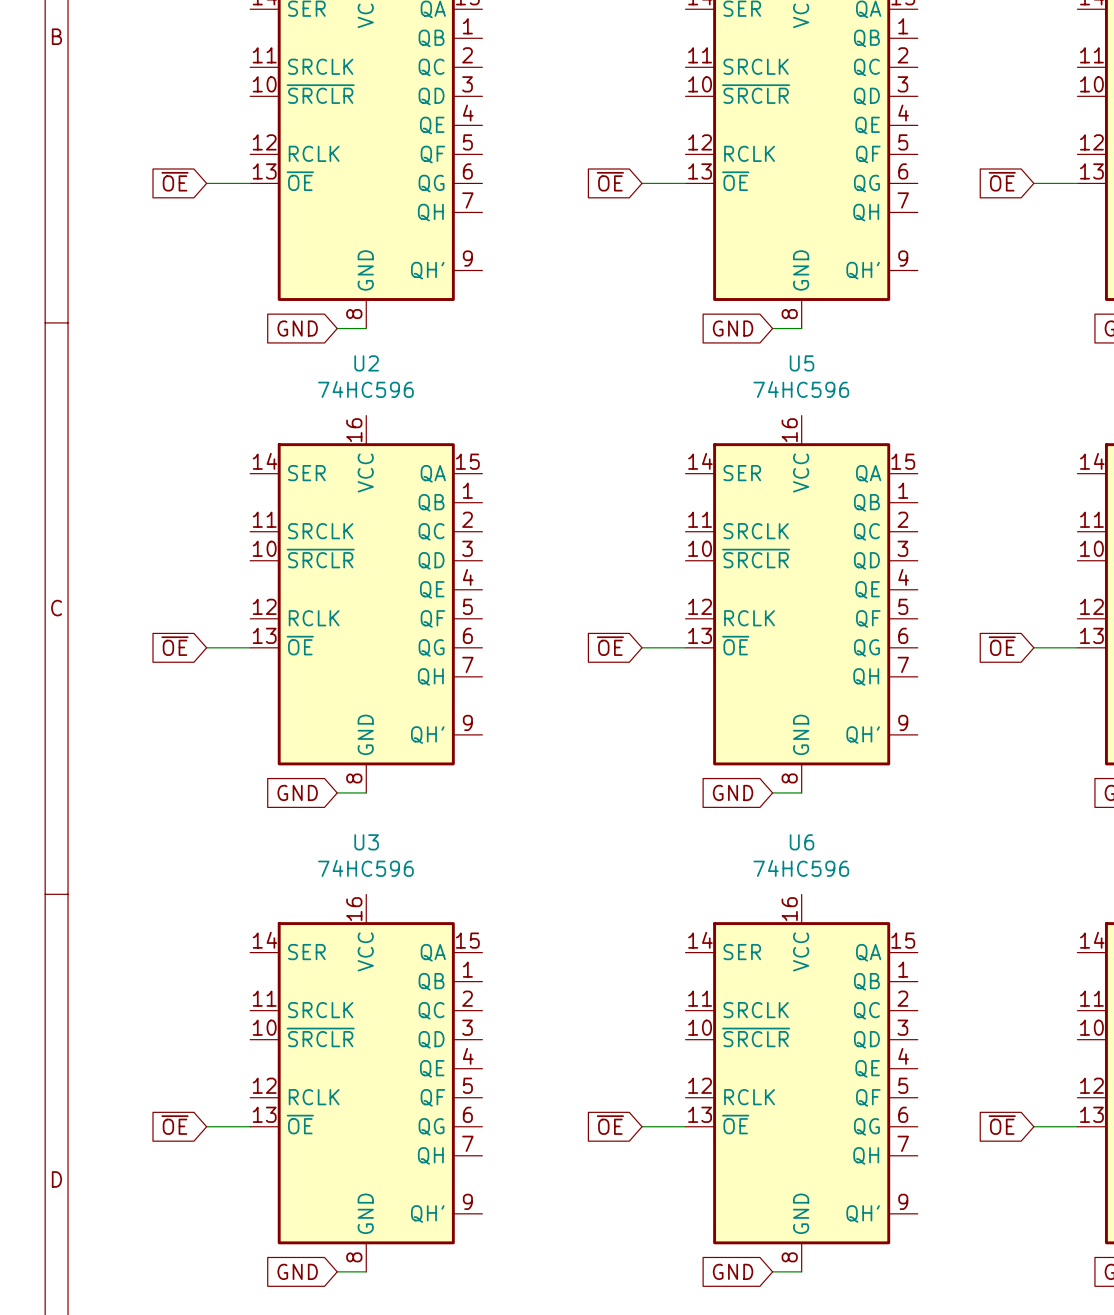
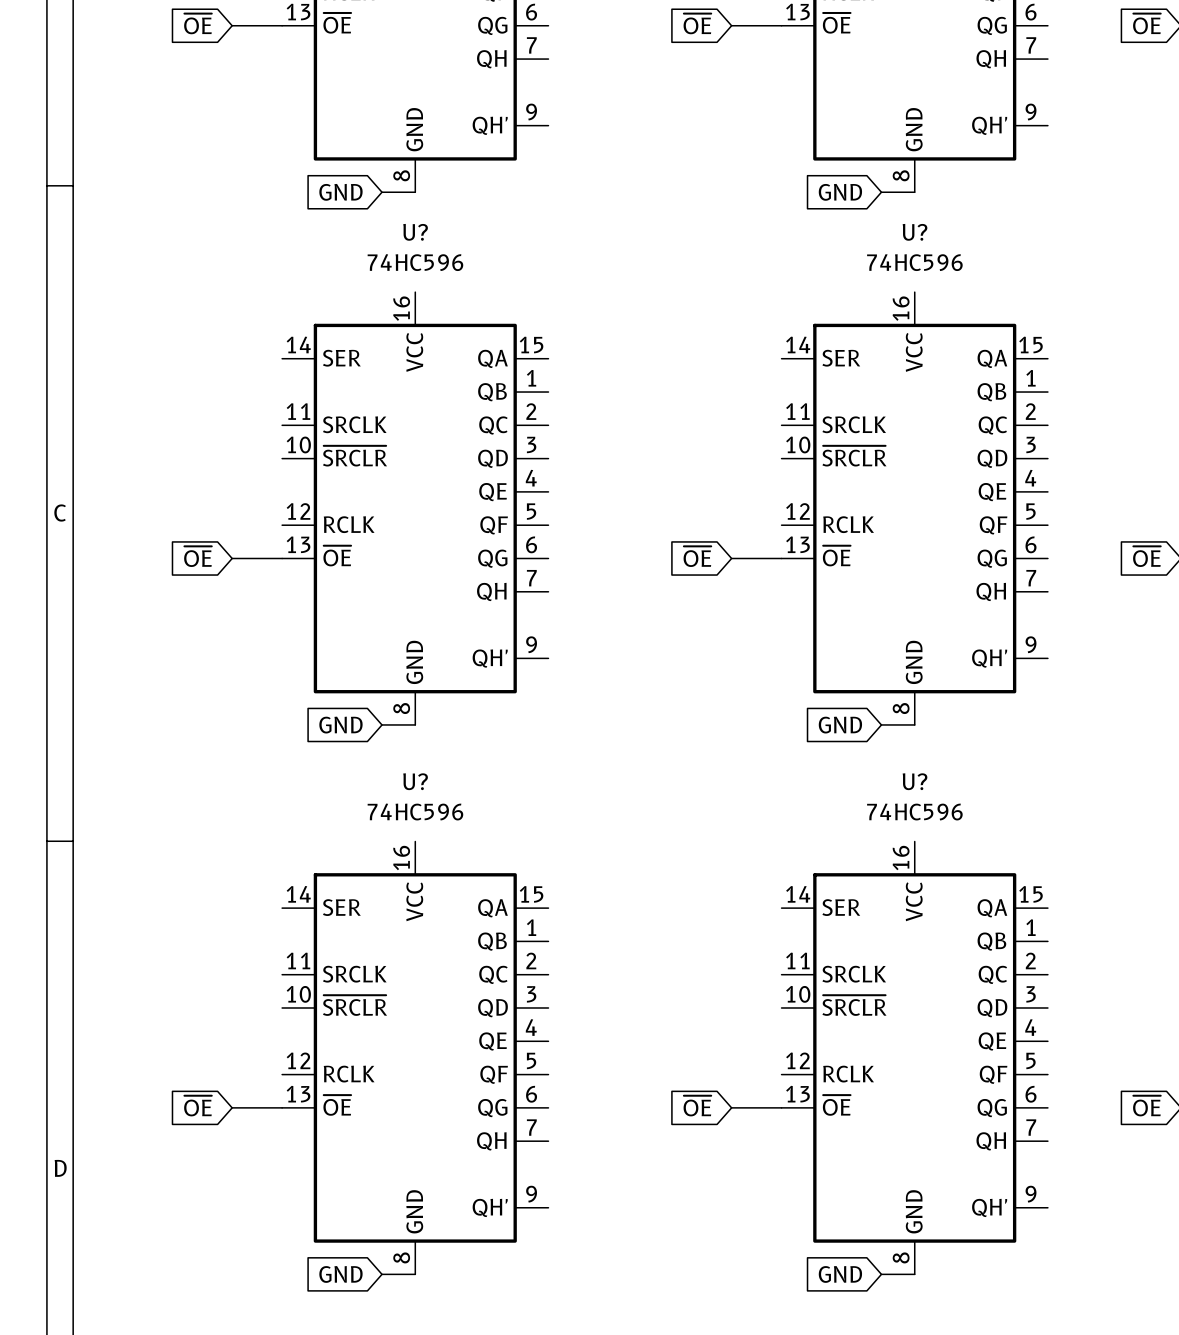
U2 name: U2 (366, 363) -> U? (415, 232)
U5 name: U5 (802, 363) -> U? (915, 232)
U3 name: U3 (366, 842) -> U? (415, 781)
U6 name: U6 (802, 842) -> U? (915, 781)

